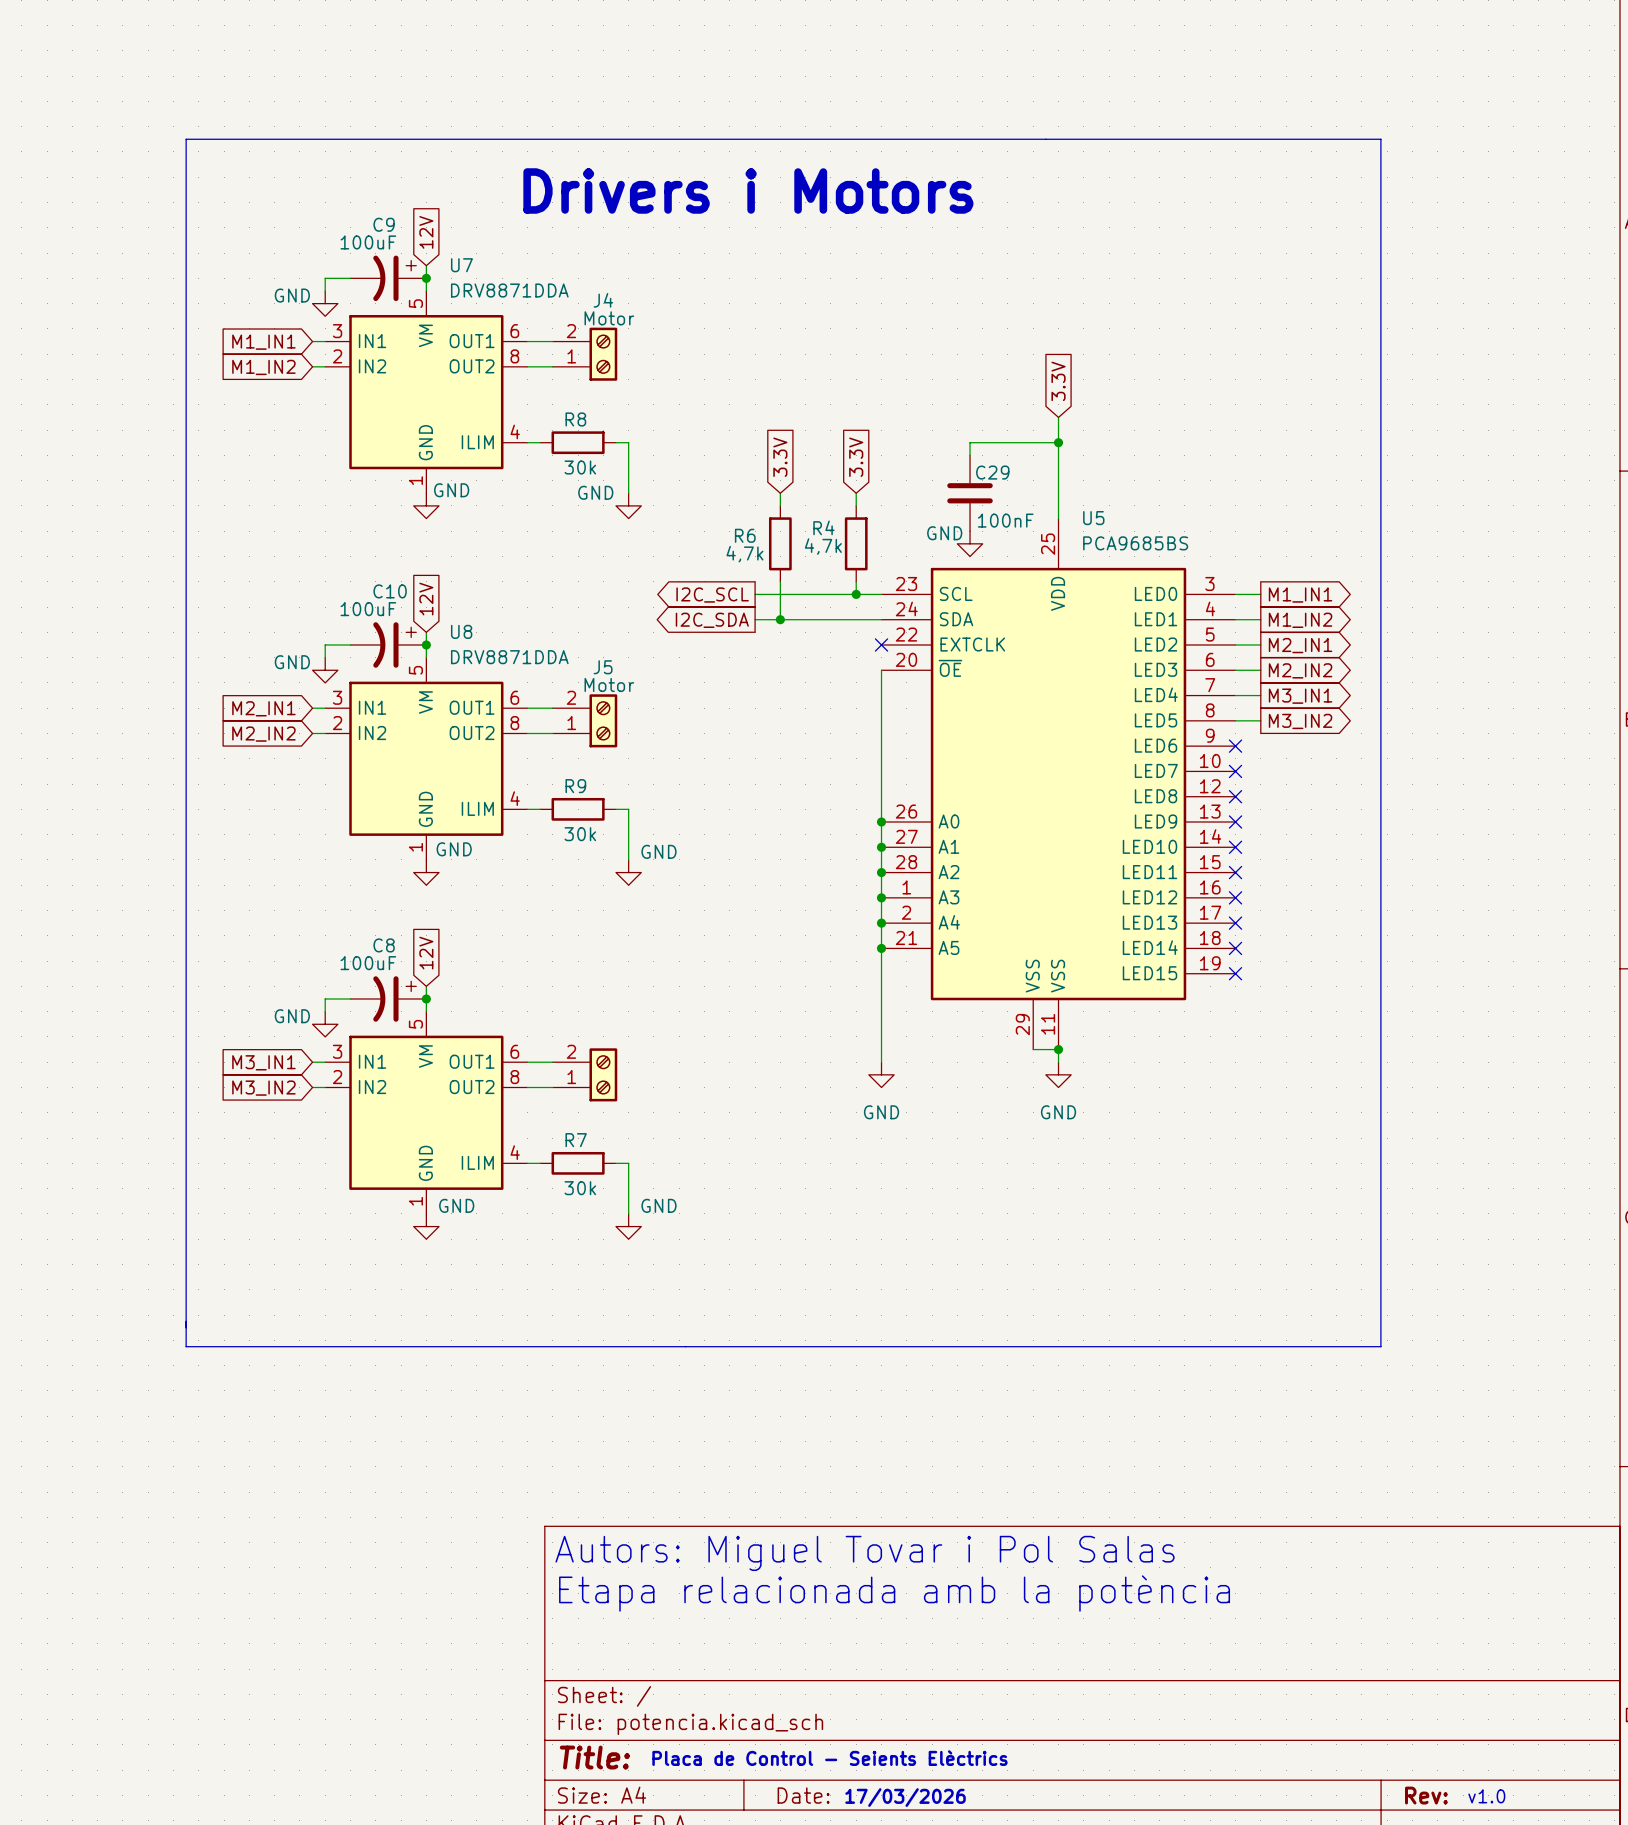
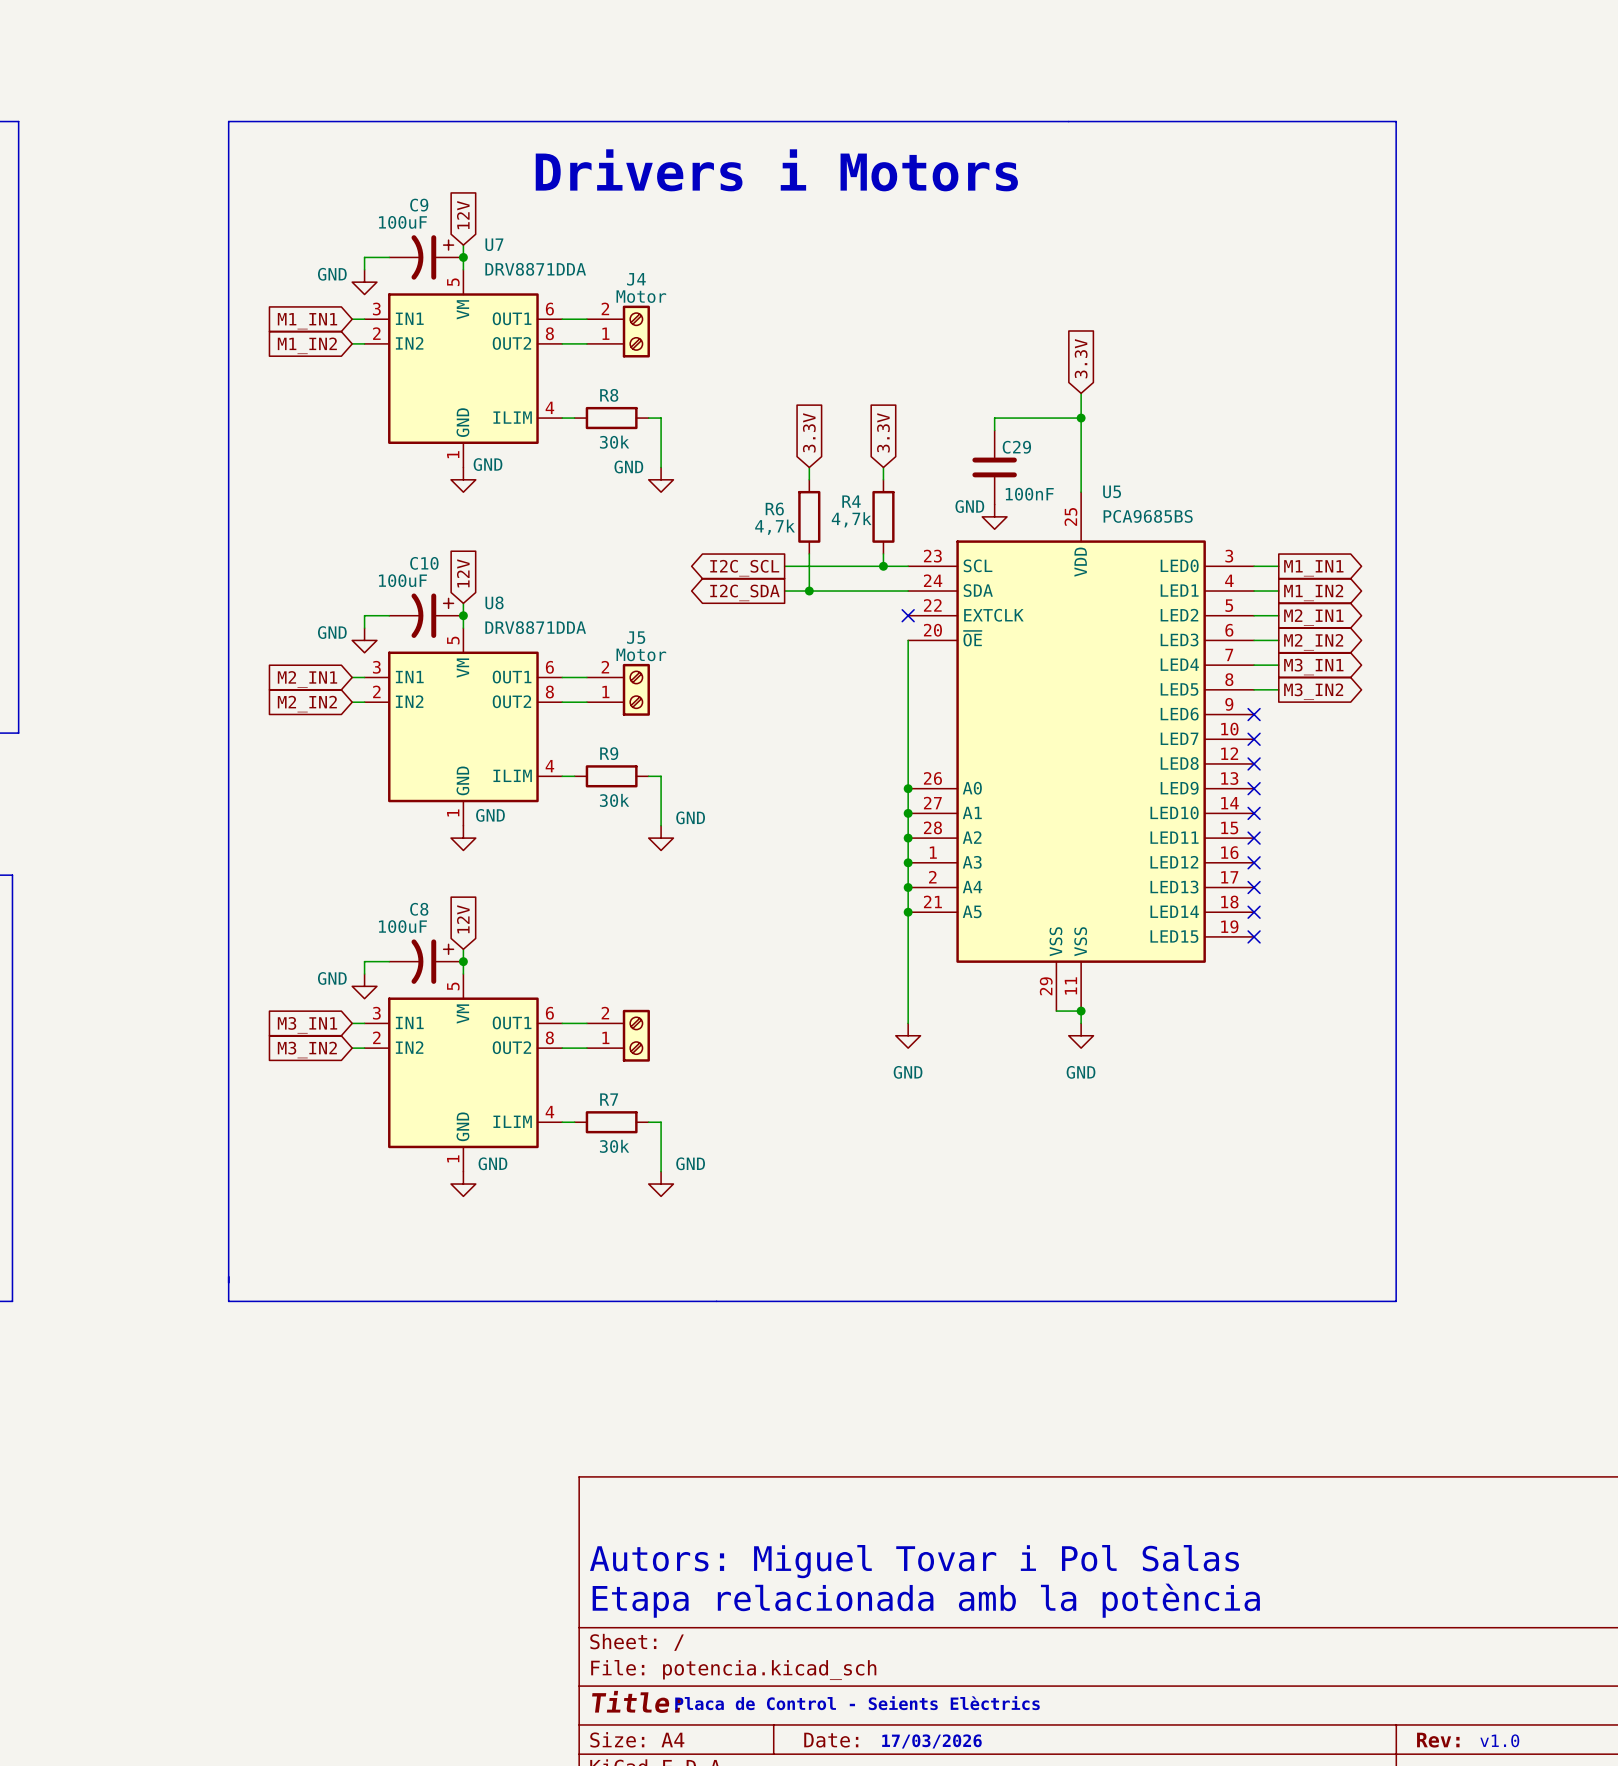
text position: Autors: Miguel Tovar i Pol Salas (865, 1553) -> Autors: Miguel Tovar i Pol Salas (914, 1561)
text position: Etapa relacionada amb la potència (894, 1593) -> Etapa relacionada amb la potència (926, 1600)

